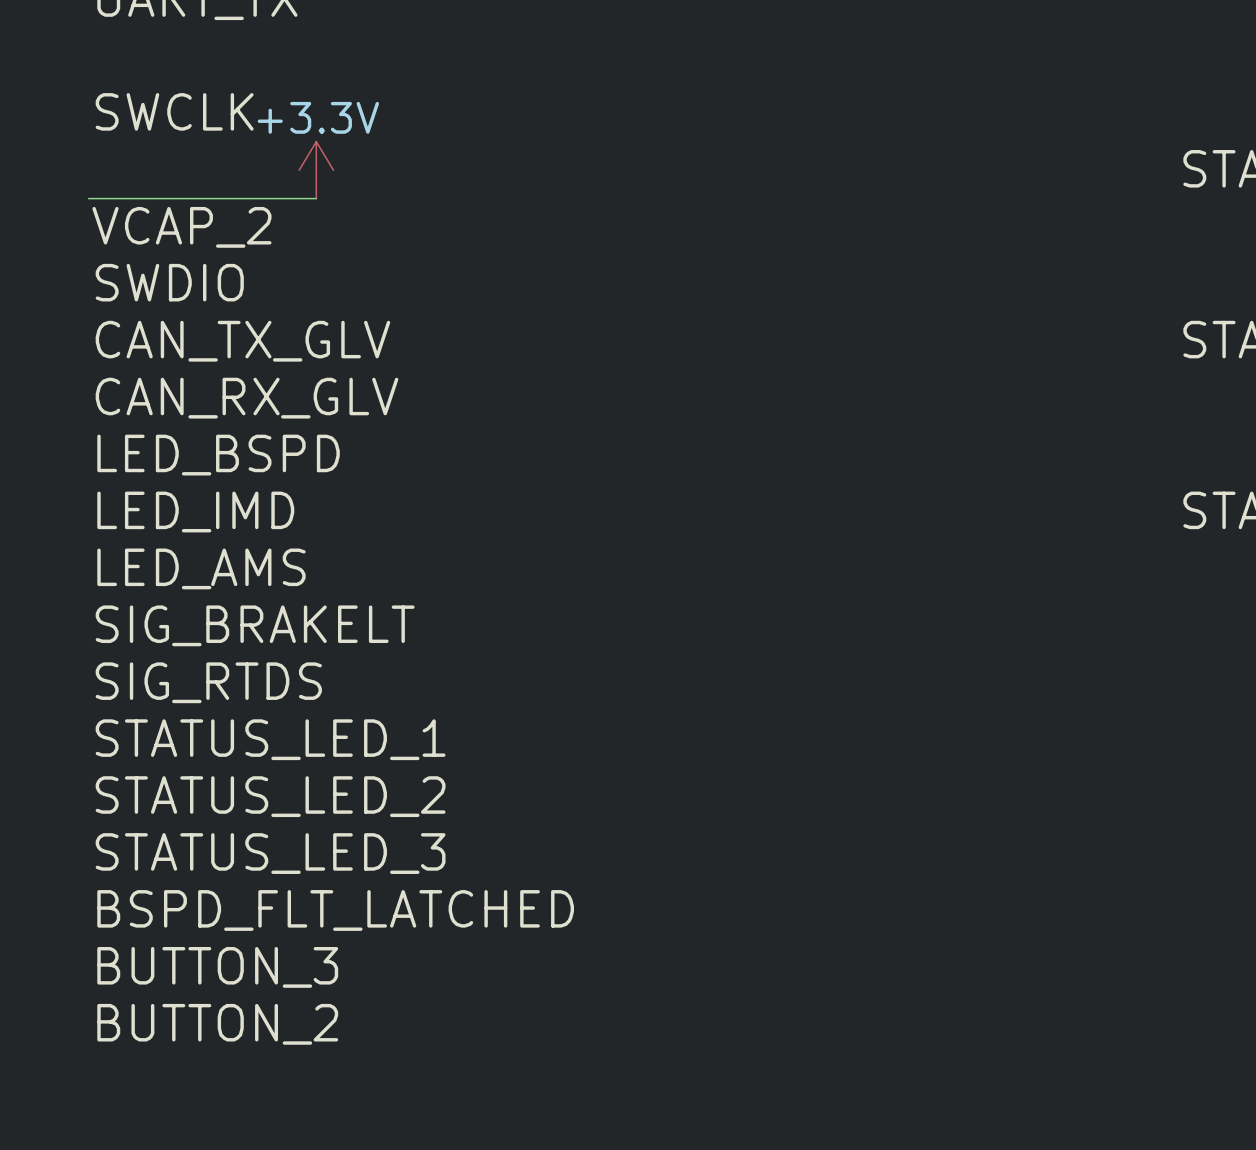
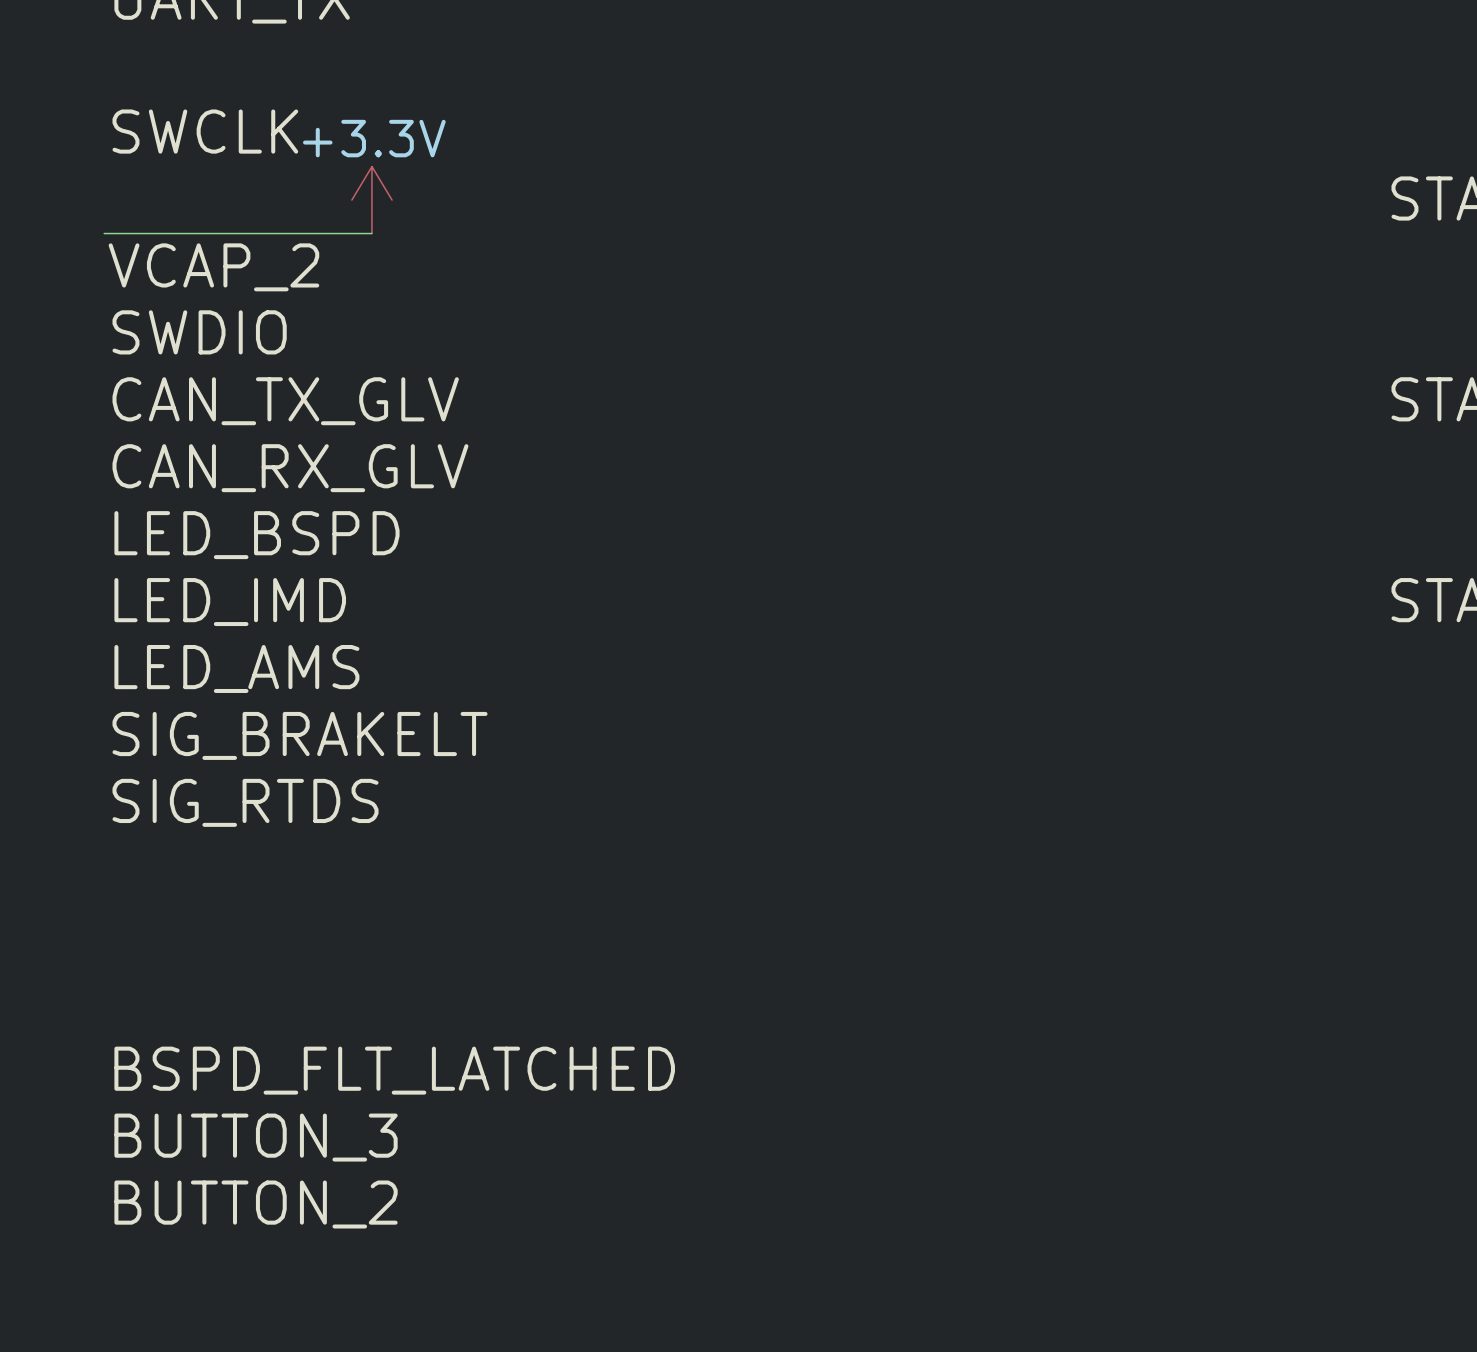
label: STATUS_LED_1 (270, 739) -> none
label: STATUS_LED_2 (270, 796) -> none
label: STATUS_LED_3 (270, 853) -> none

